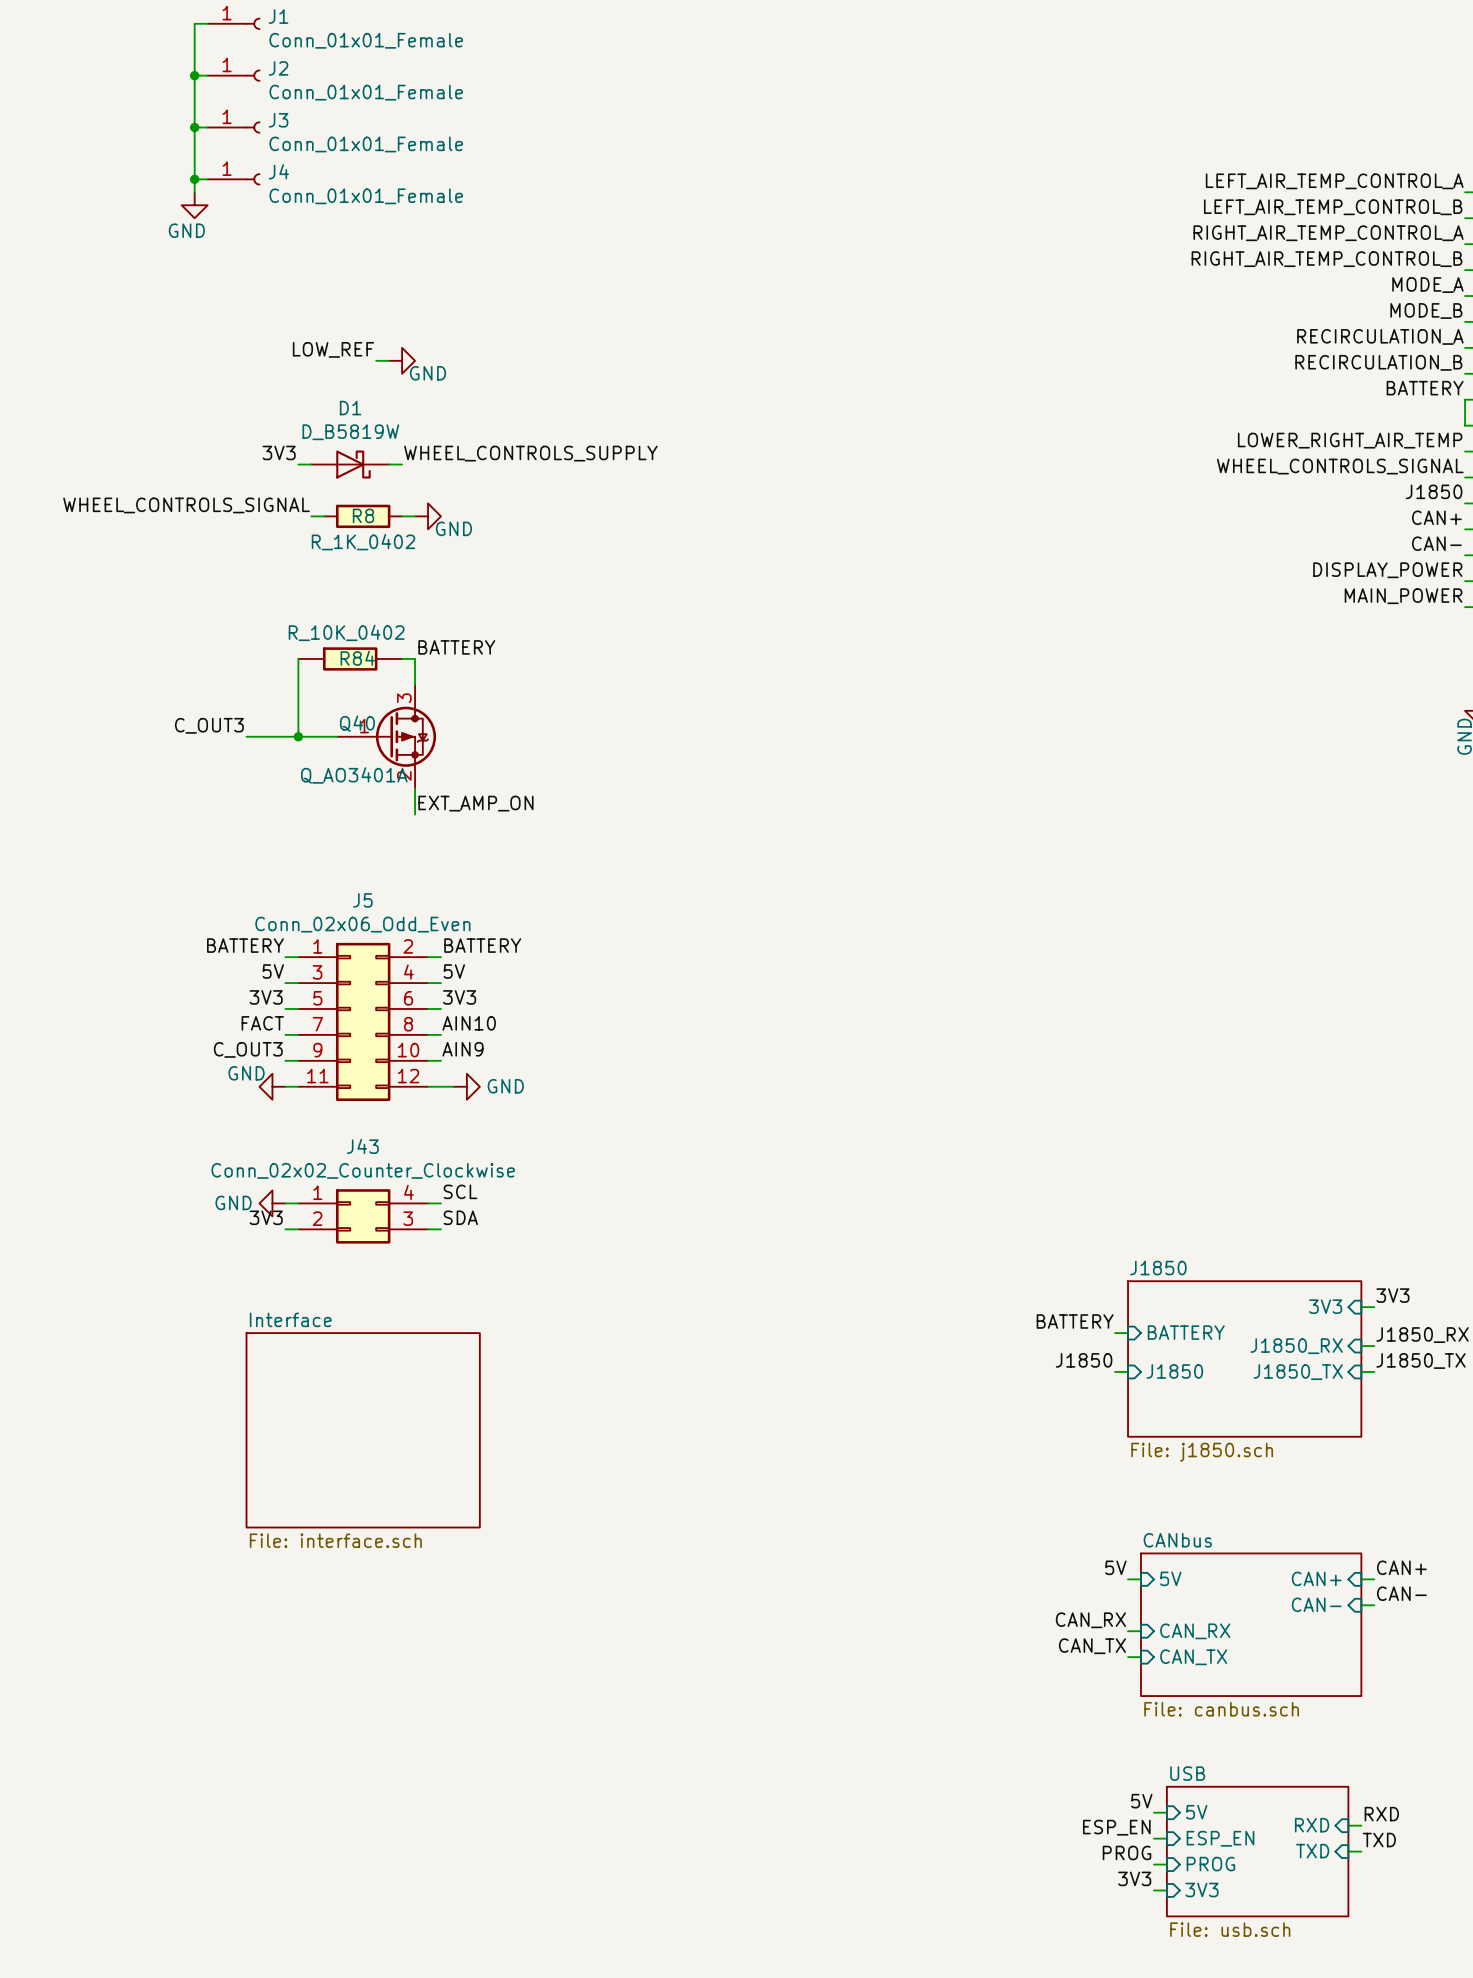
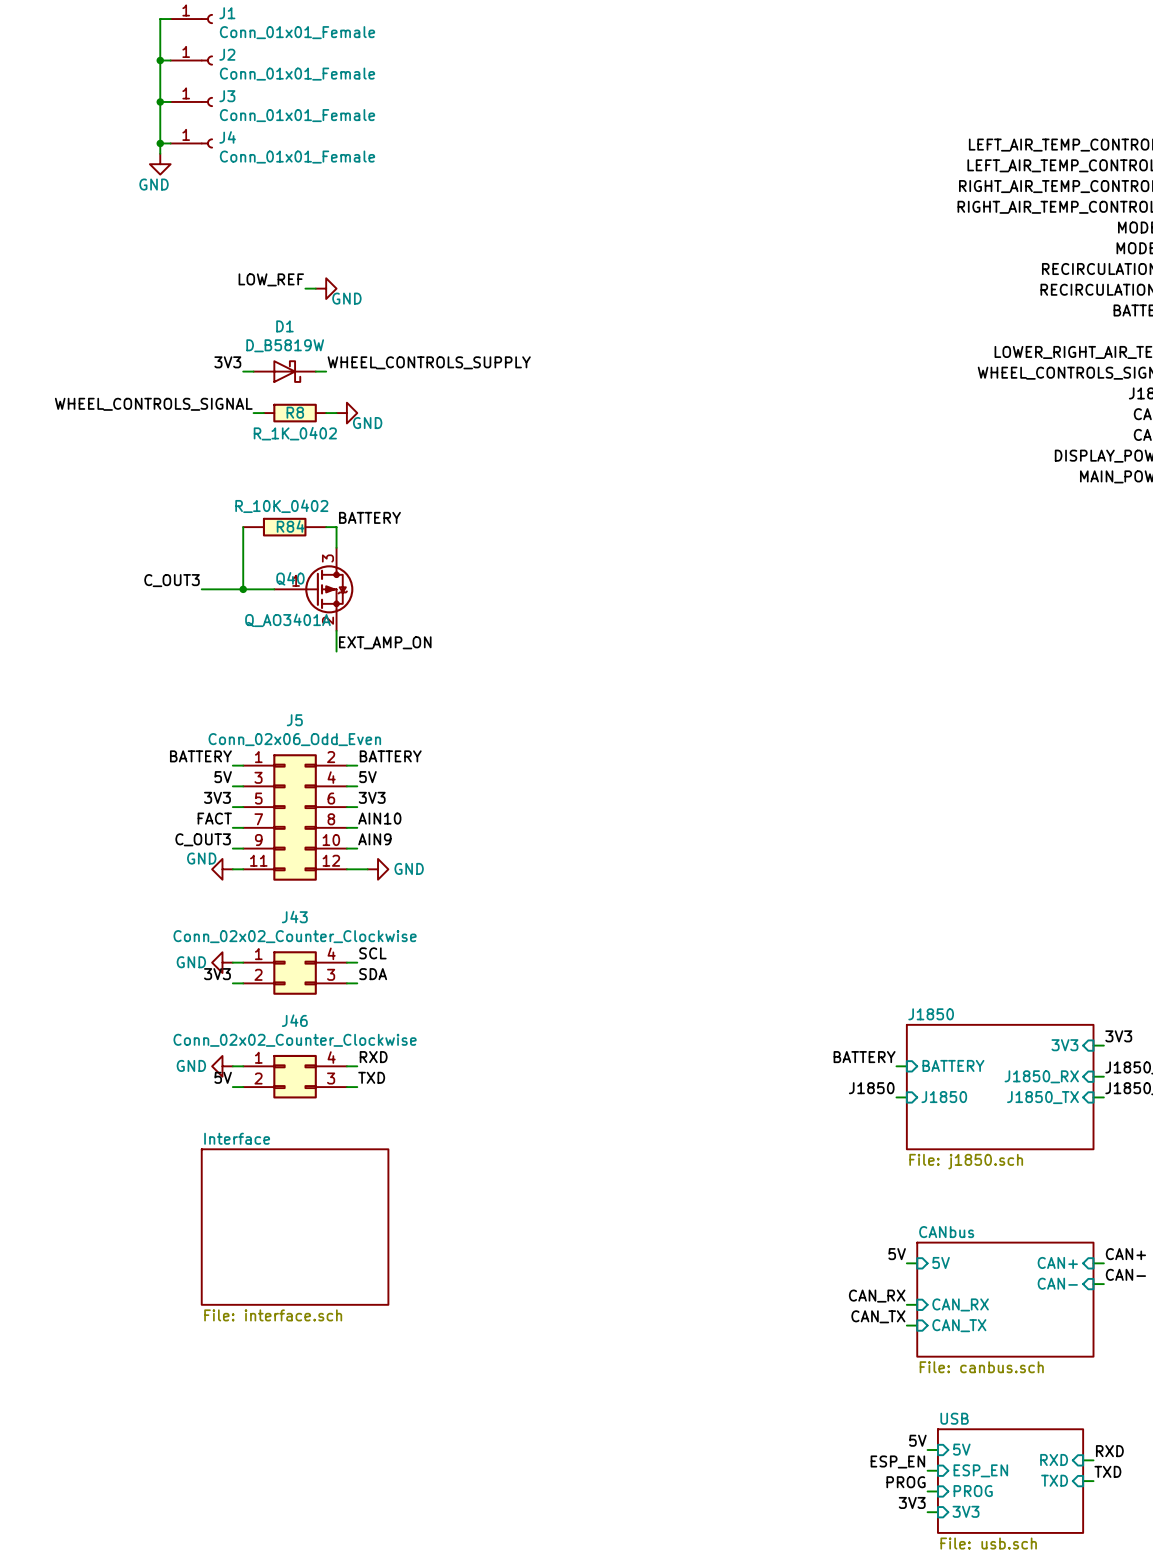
label: none -> RXD (373, 1057)
power symbol: none -> GND (222, 1066)
J46: none -> Conn_02x02_Counter_Clockwise (295, 1076)
label: none -> 5V (223, 1077)
label: none -> TXD (371, 1077)
wire: none -> (232, 1087) (243, 1087)
wire: none -> (346, 1087) (357, 1087)
sheet Interface position: (363, 1430) -> (295, 1227)

